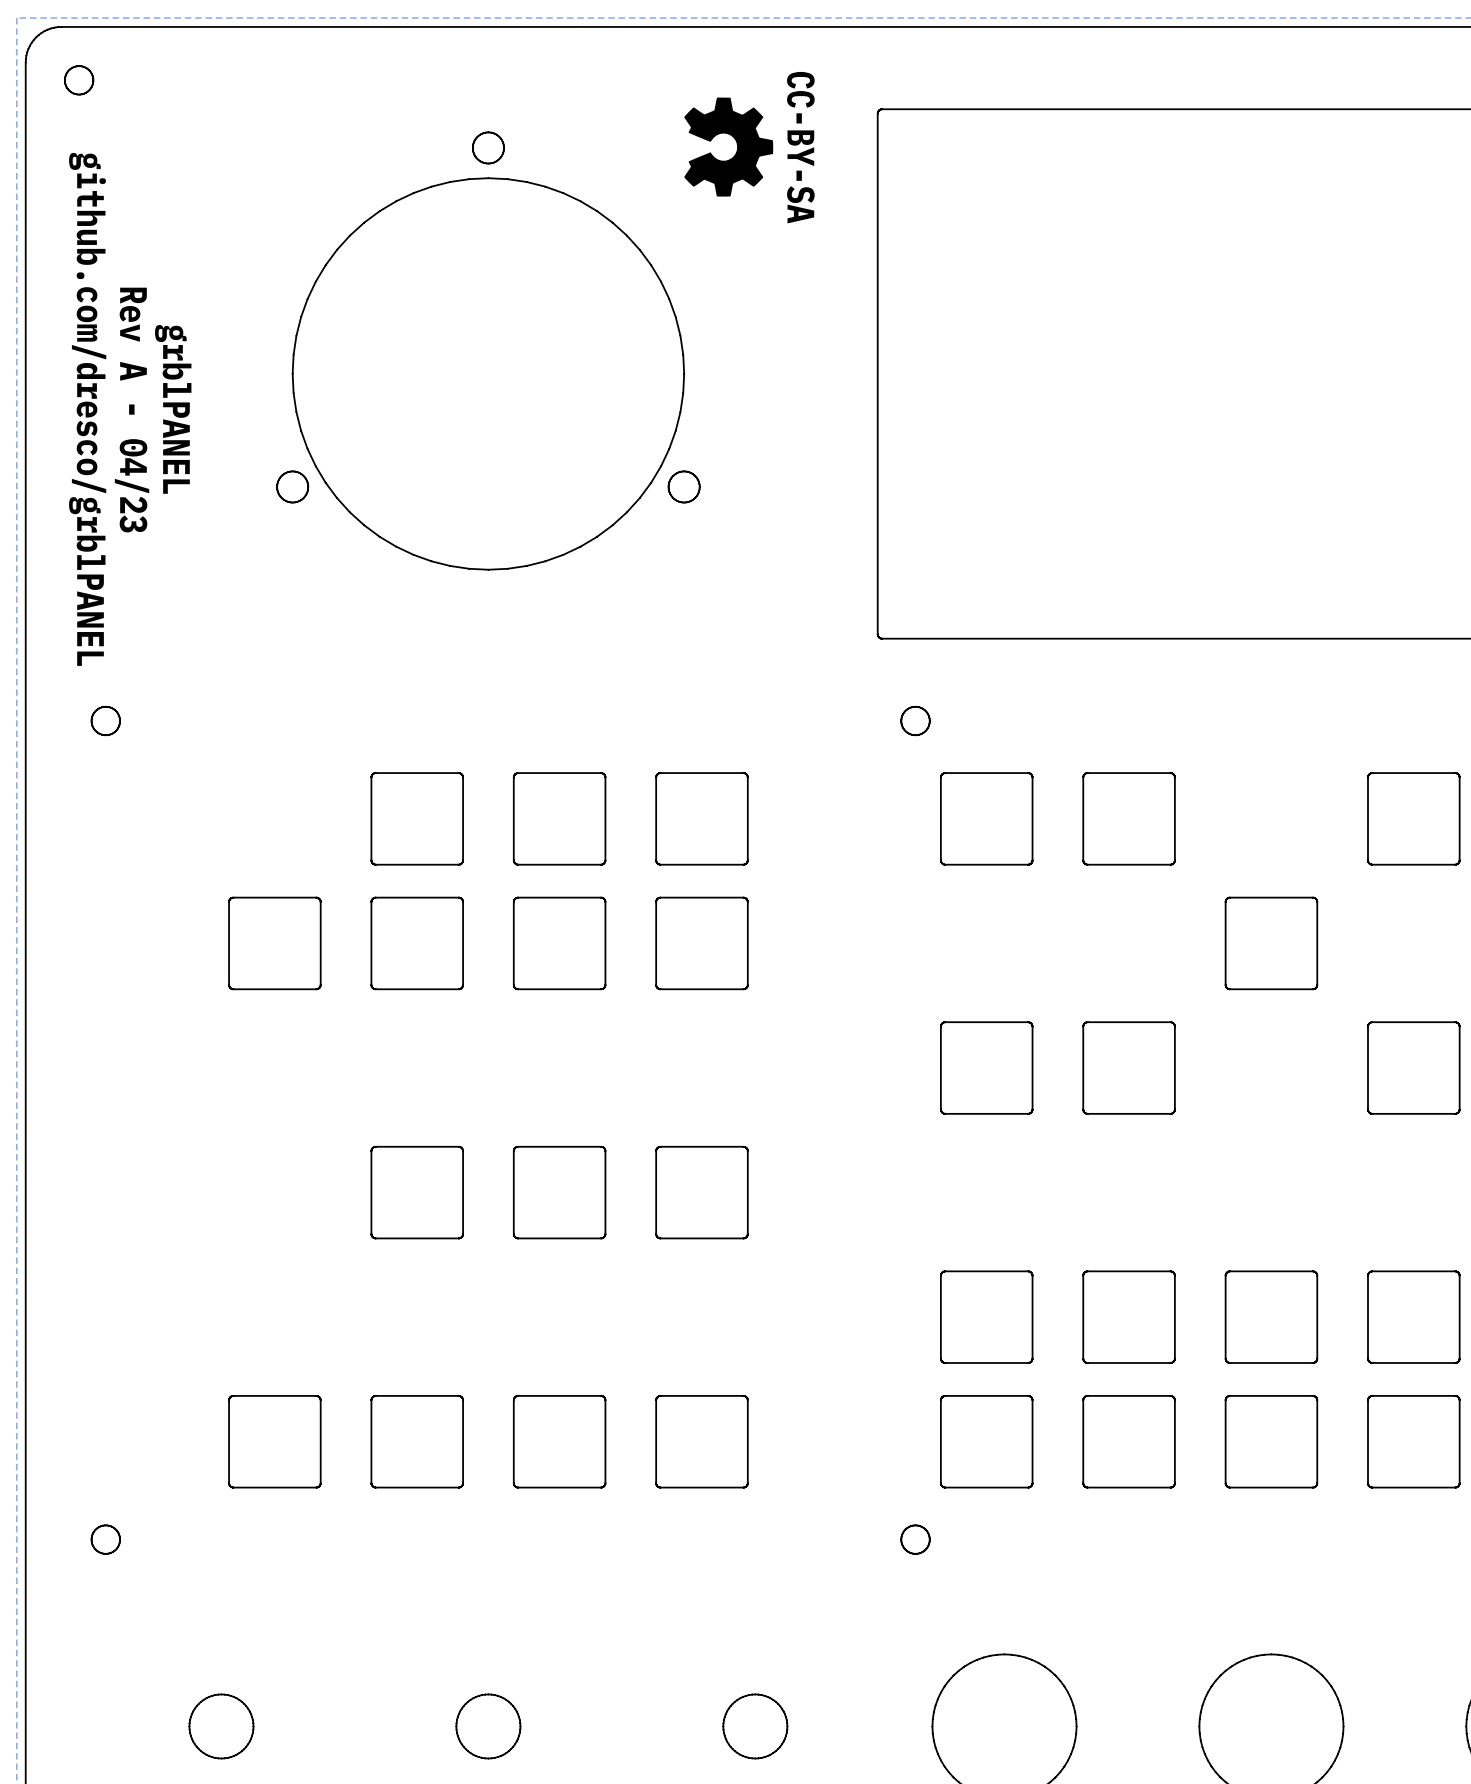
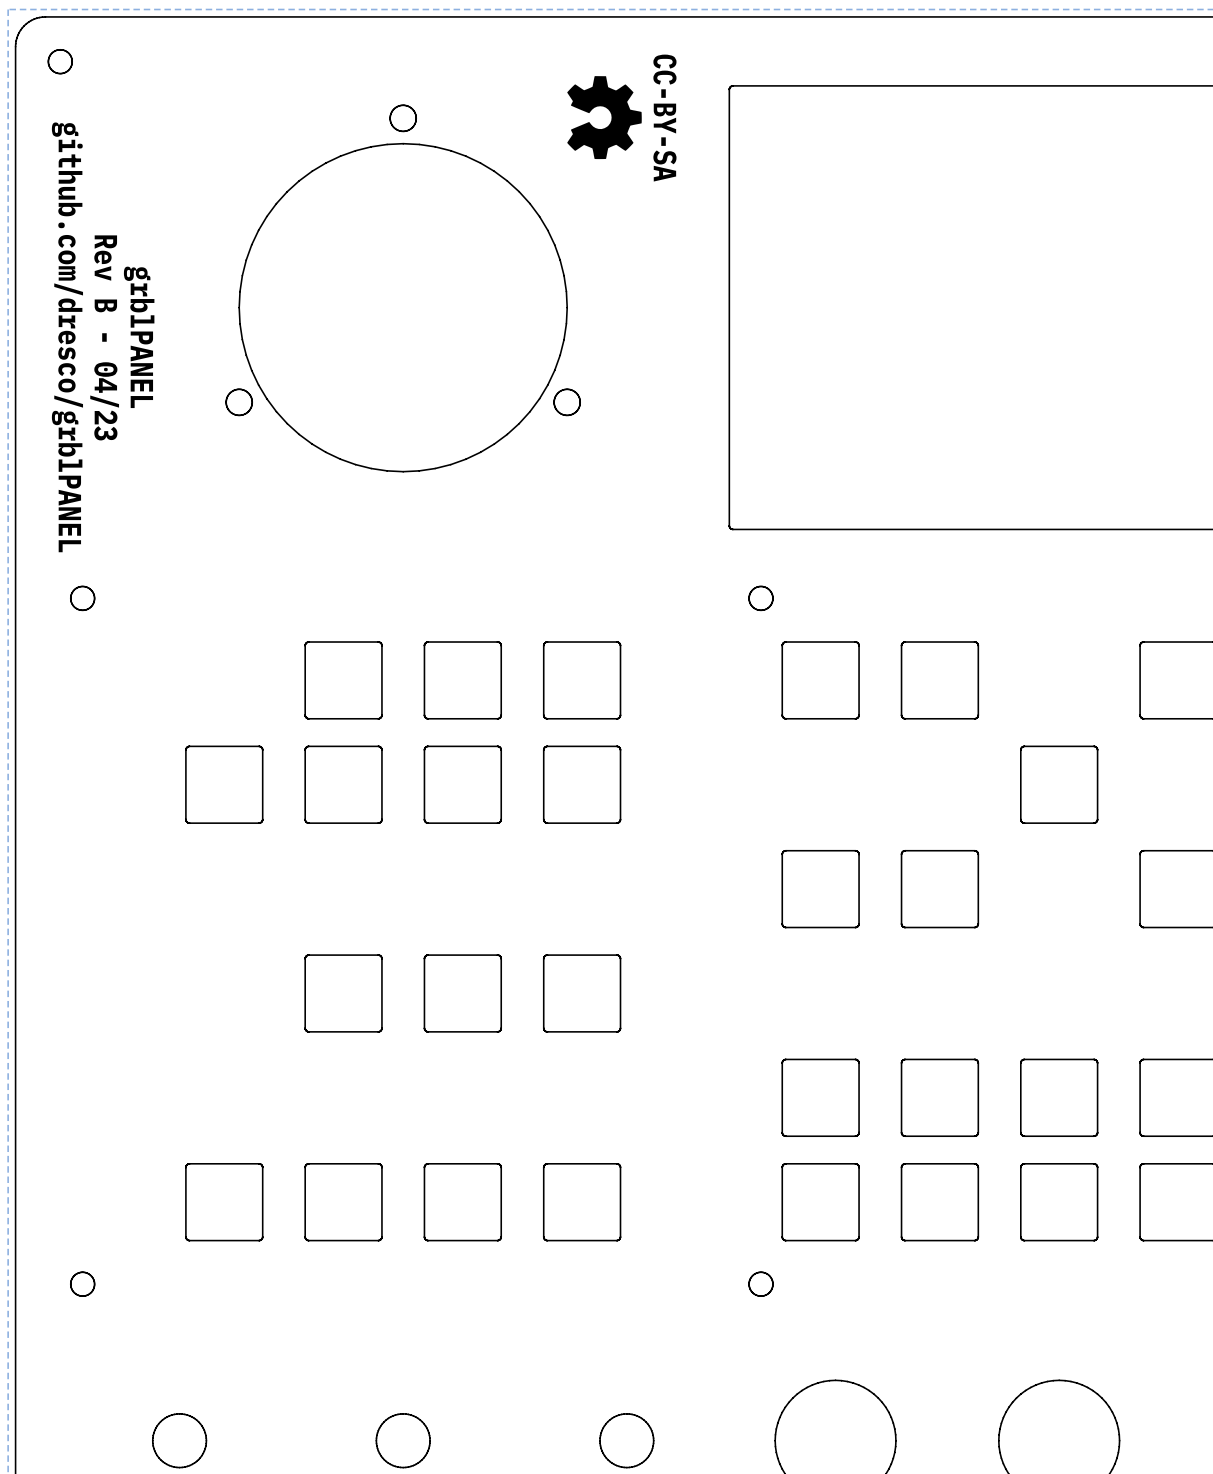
text: Rev A - 04/23 (132, 410) -> Rev B - 04/23 (104, 337)

